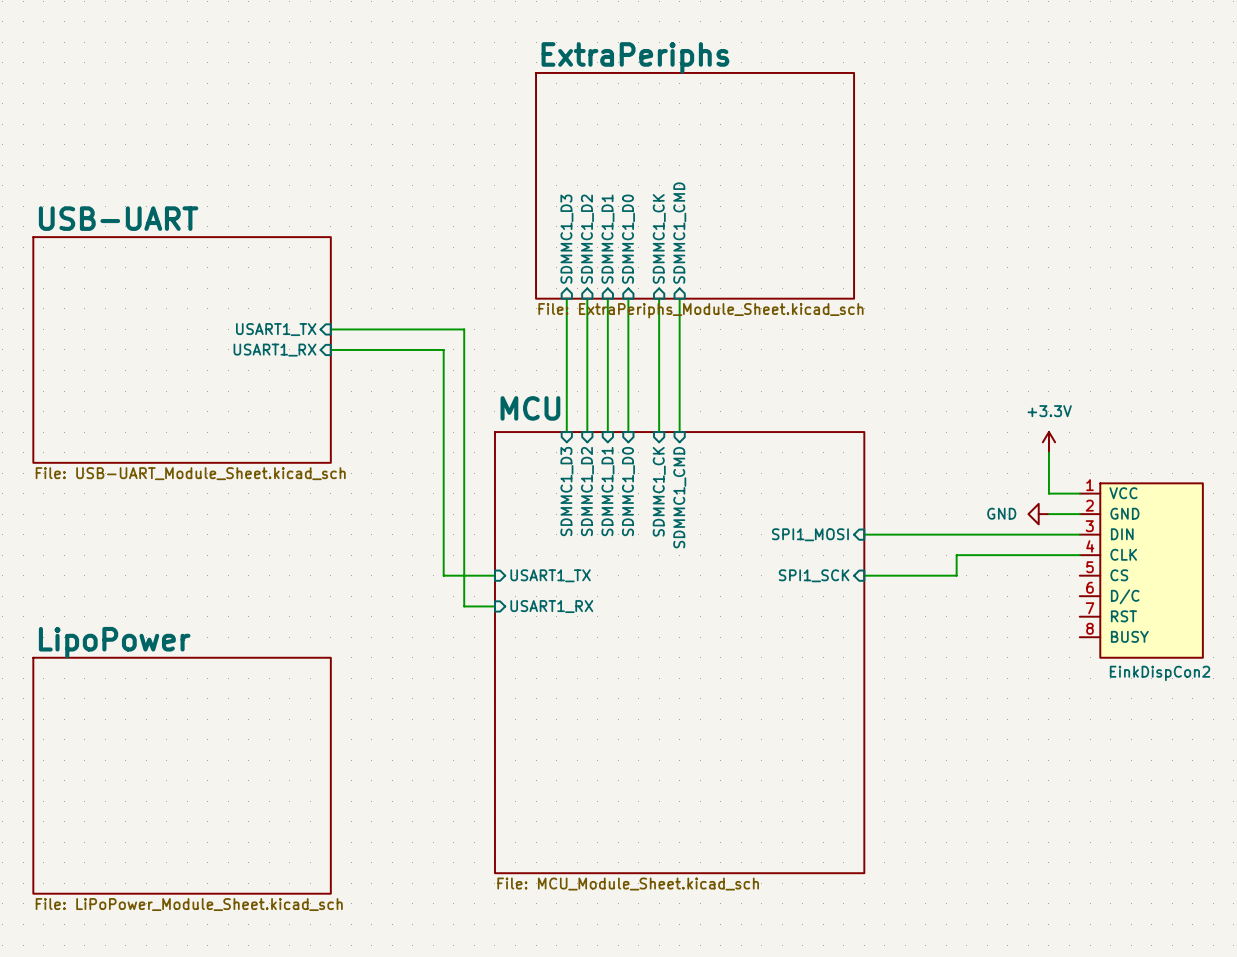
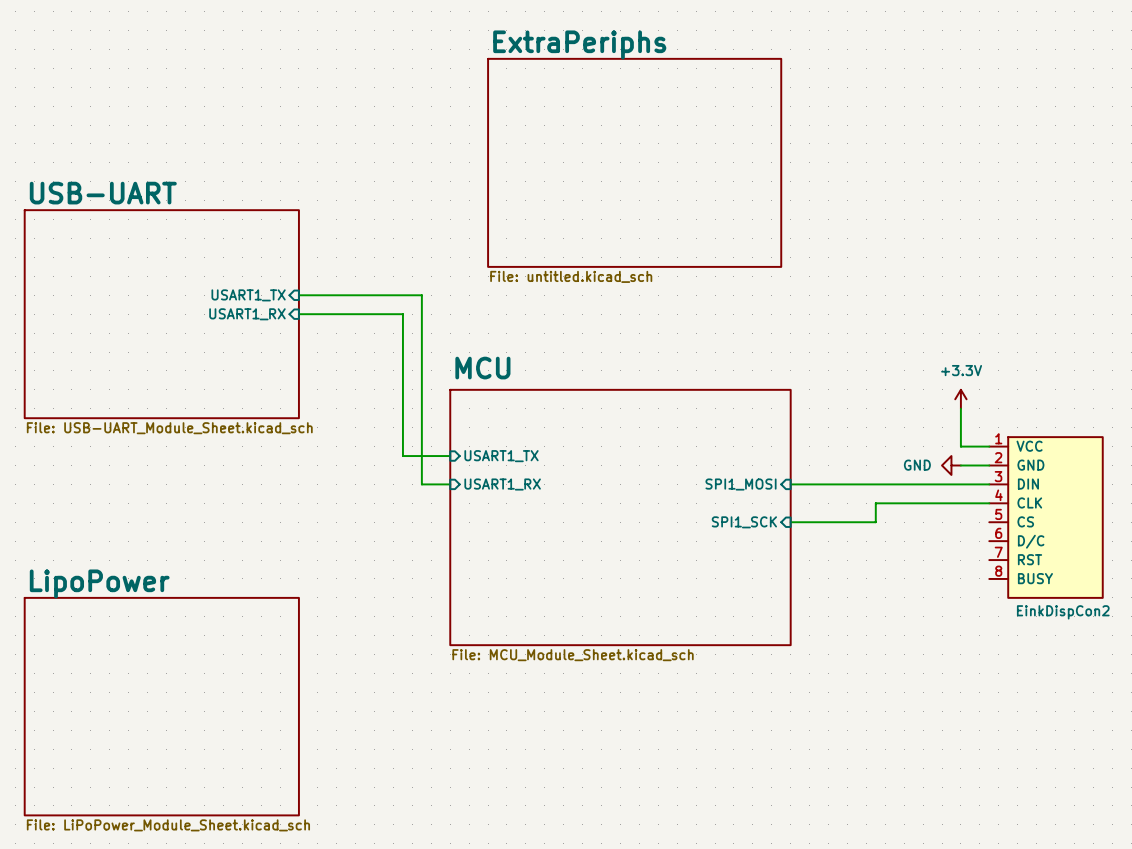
sheet pin: SDMMC1_CMD (679, 233) -> none
sheet pin: SDMMC1_CK (659, 238) -> none
sheet pin: SDMMC1_D3 (566, 239) -> none
sheet pin: SDMMC1_D2 (587, 239) -> none
sheet pin: SDMMC1_D1 (607, 239) -> none
sheet pin: SDMMC1_D0 (628, 239) -> none
wire: (566, 298) (566, 432) -> none
wire: (587, 298) (587, 432) -> none
wire: (607, 298) (607, 432) -> none
wire: (628, 298) (628, 432) -> none
wire: (659, 298) (659, 432) -> none
wire: (679, 298) (679, 432) -> none
sheet ExtraPeriphs value: File: ExtraPeriphs_Module_Sheet.kicad_sch (700, 310) -> File: untitled.kicad_sch (571, 276)
sheet pin: SDMMC1_D3 (566, 491) -> none
sheet pin: SDMMC1_D2 (587, 491) -> none
sheet pin: SDMMC1_D1 (607, 491) -> none
sheet pin: SDMMC1_D0 (628, 491) -> none
sheet pin: SDMMC1_CK (659, 491) -> none
sheet pin: SDMMC1_CMD (679, 497) -> none
wire: (443, 503) (443, 575) (494, 575) -> (402, 456) (450, 456)
wire: (464, 534) (464, 606) (494, 606) -> (421, 484) (450, 484)
sheet MCU: none -> File: MCU_Module_Sheet.kicad_sch (620, 517)
sheet pin position: USART1_TX (550, 575) -> USART1_TX (501, 456)
sheet pin position: USART1_RX (551, 606) -> USART1_RX (502, 484)
sheet MCU: File: MCU_Module_Sheet.kicad_sch (679, 652) -> none

